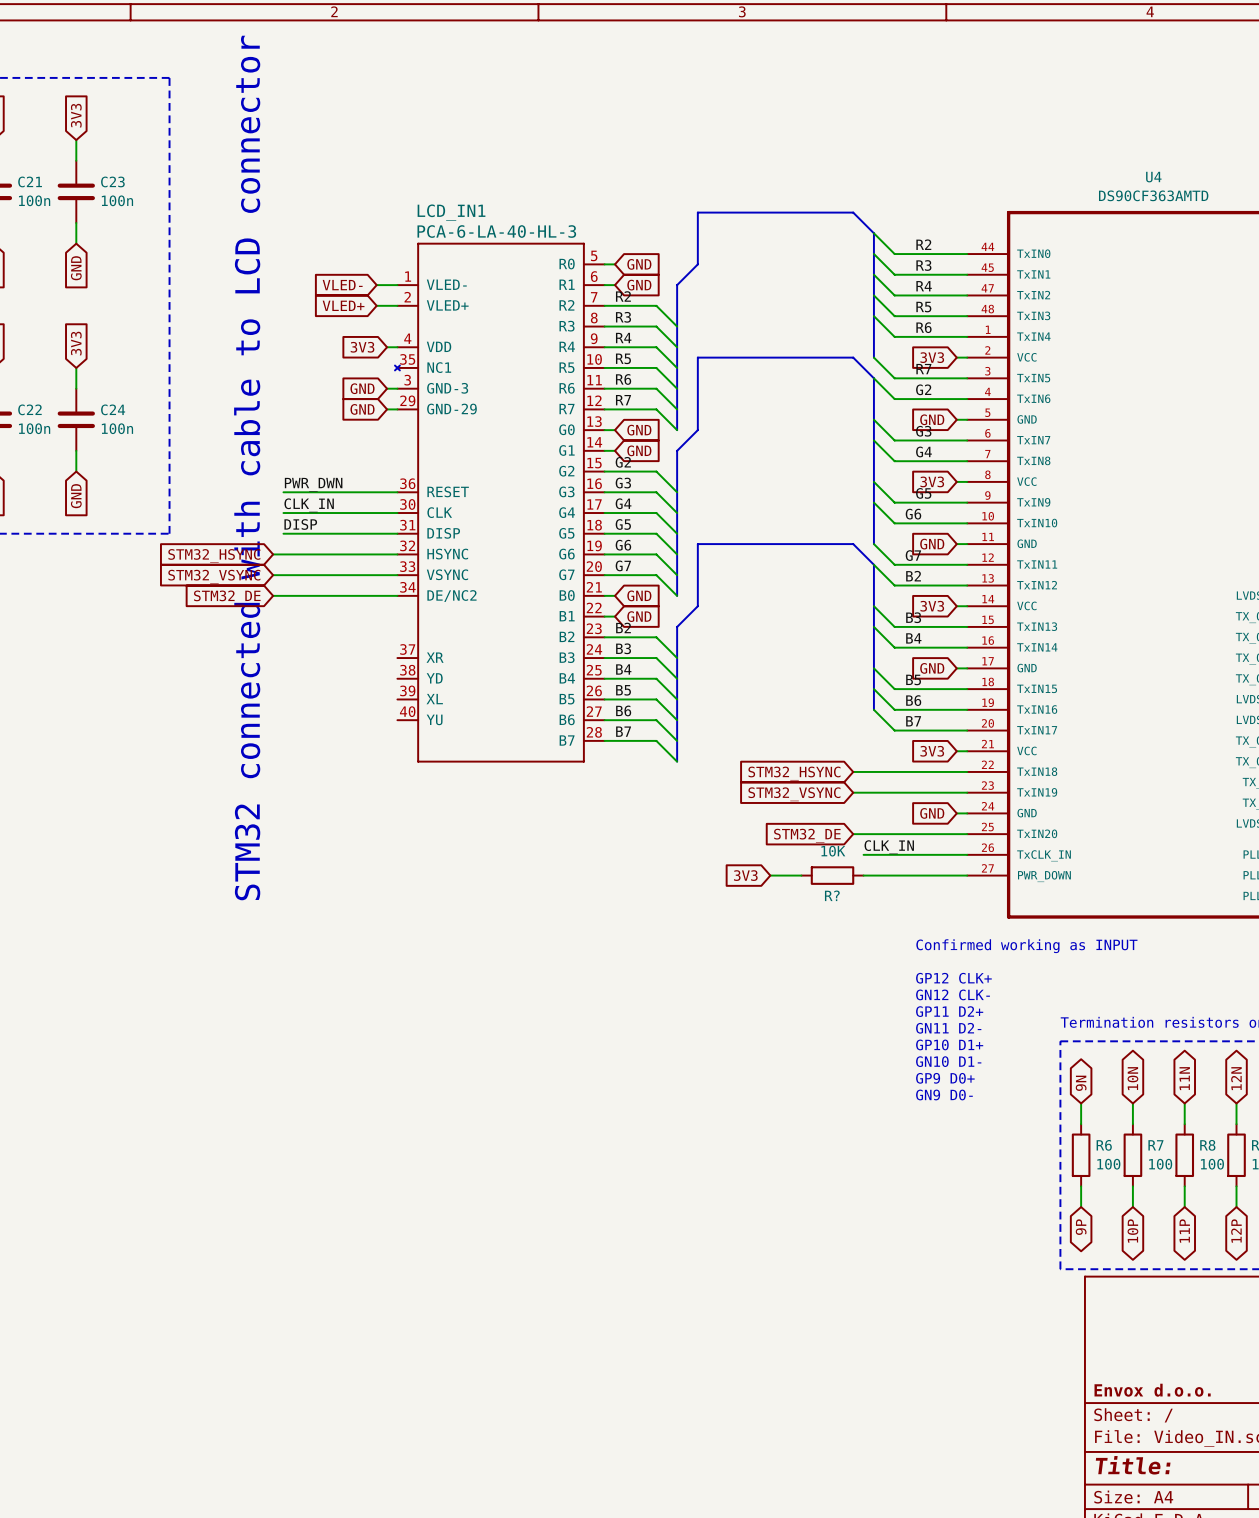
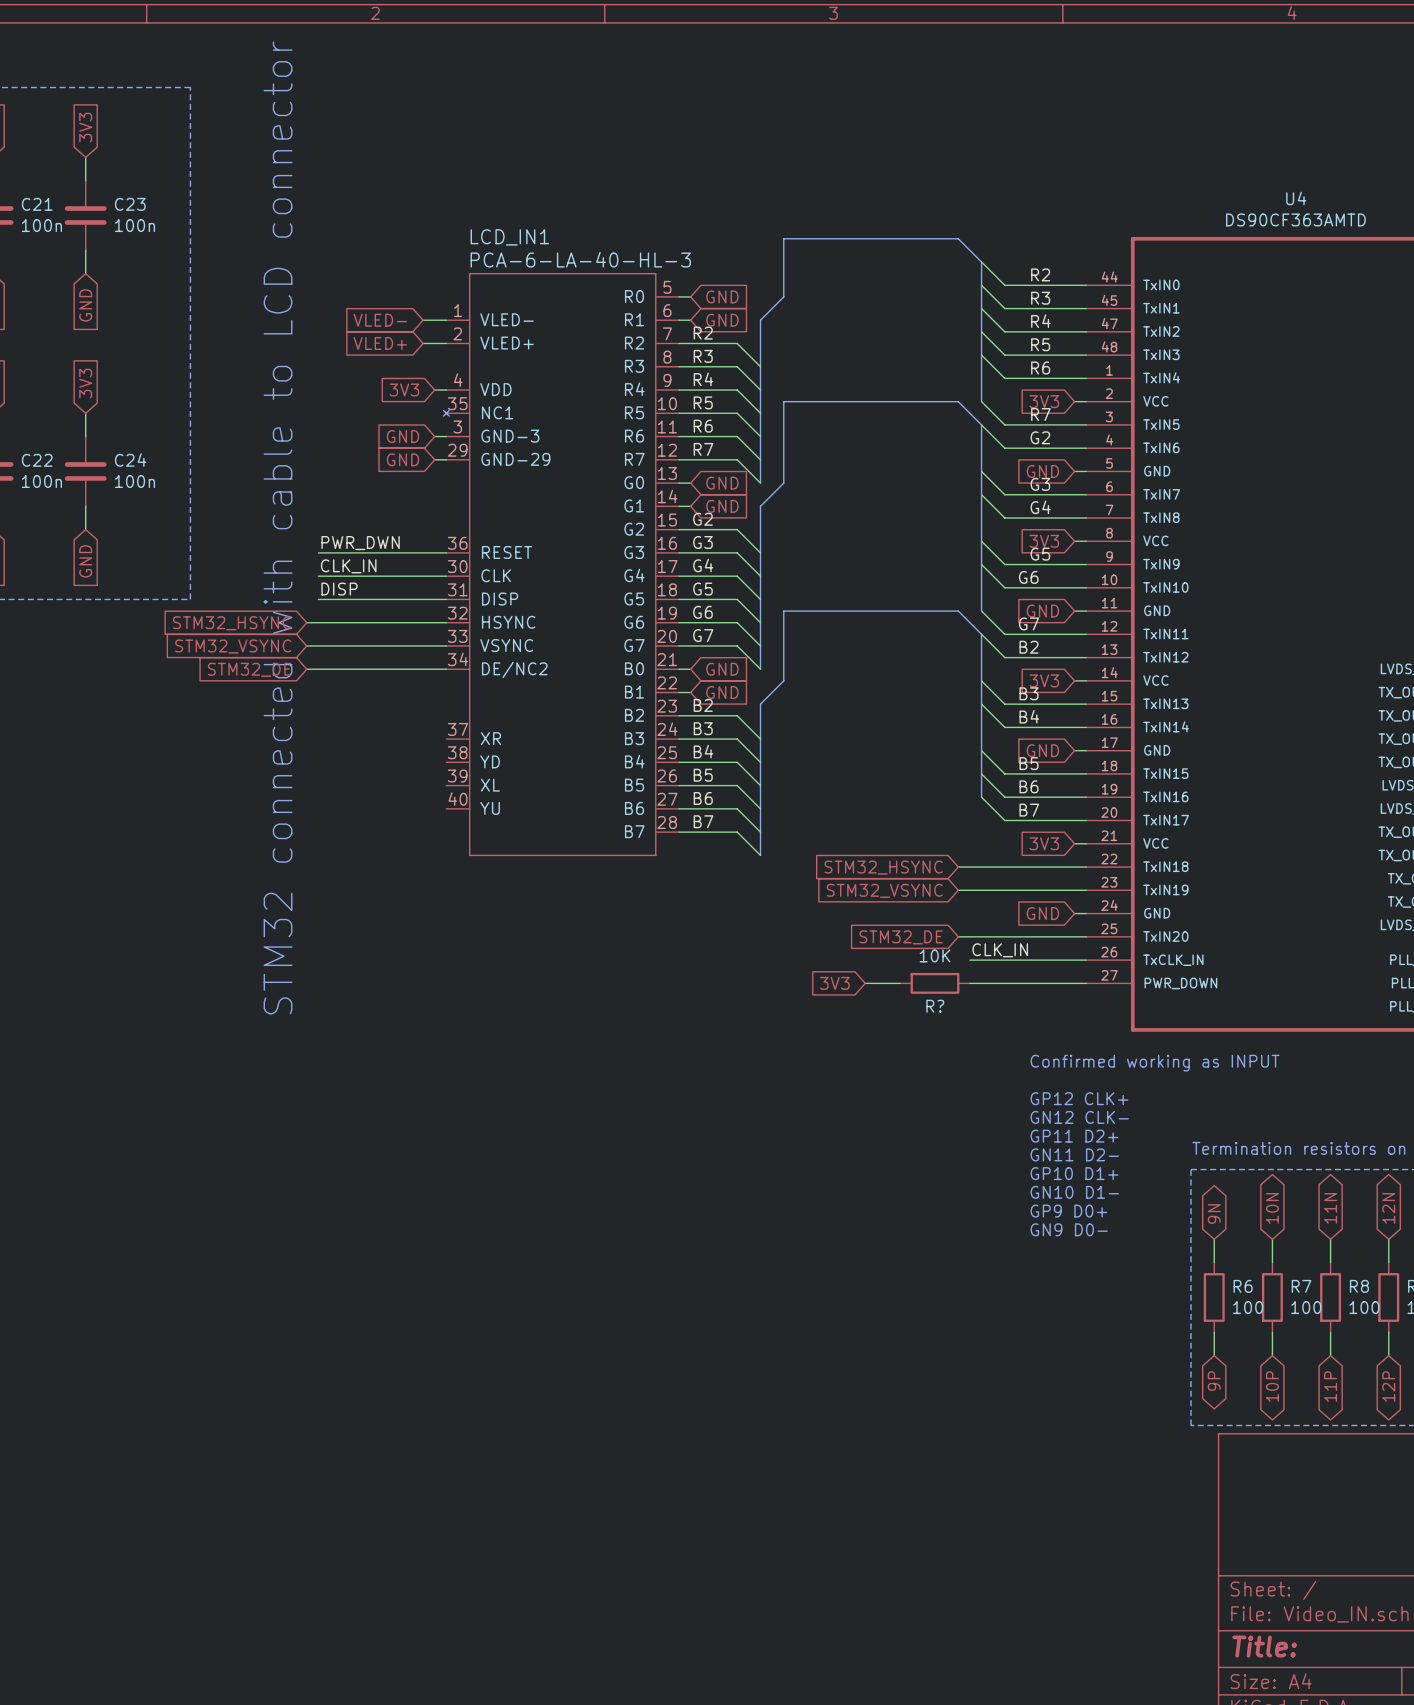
title block: Envox d.o.o. (1152, 1390) -> none

